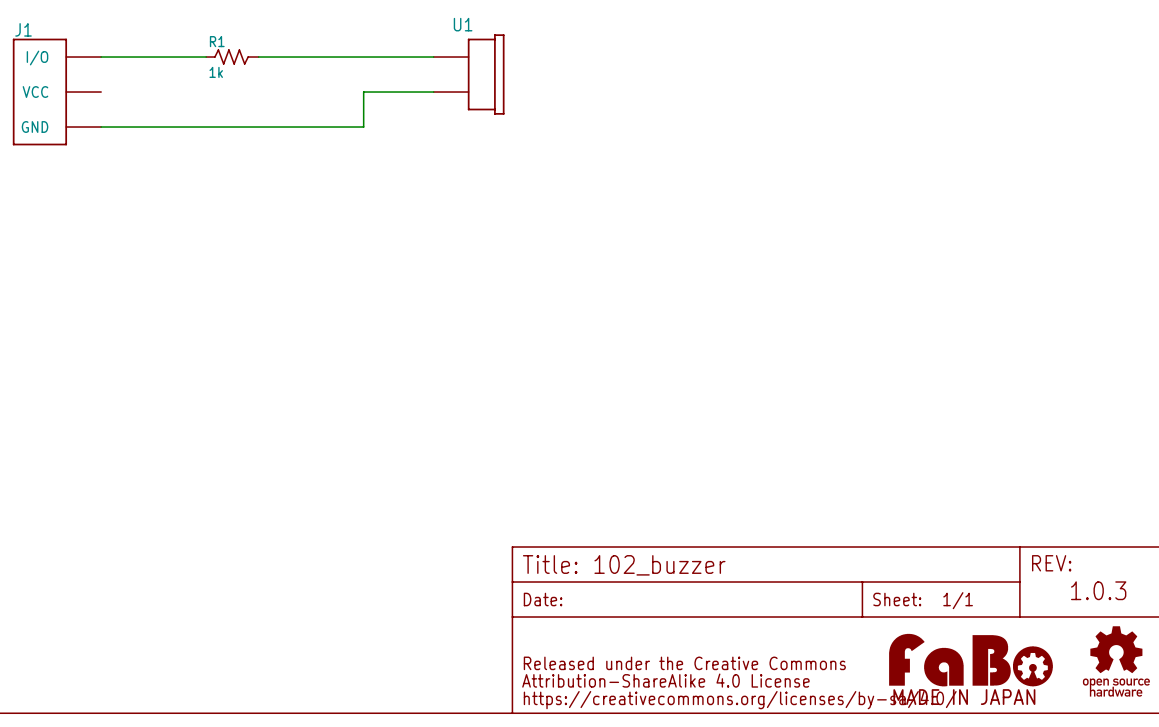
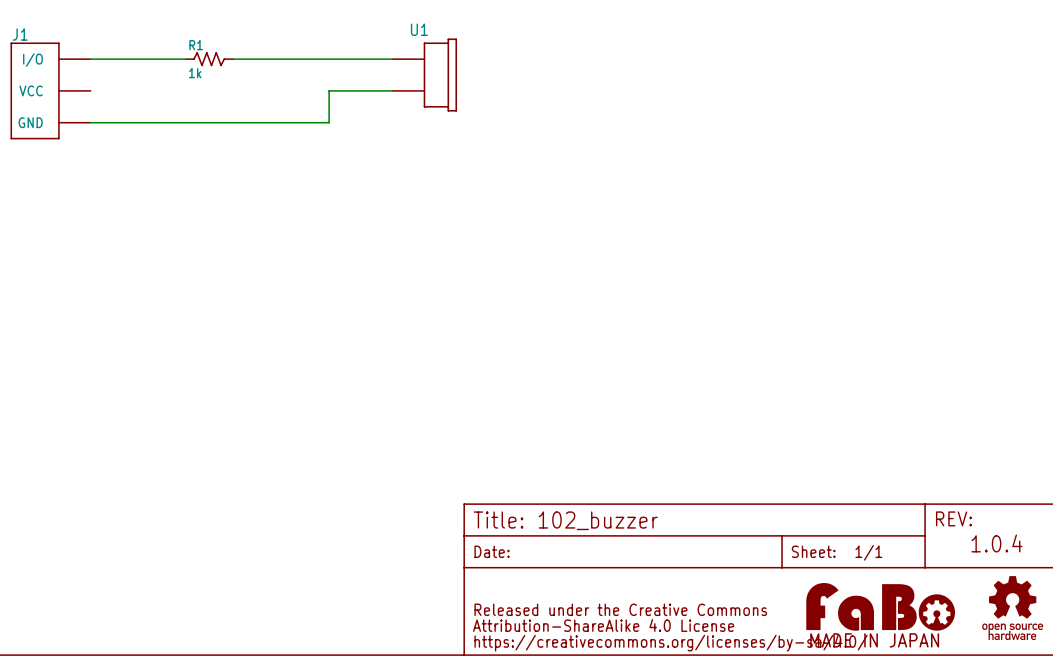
text: 1.0.3 (1098, 590) -> 1.0.4 (996, 543)

